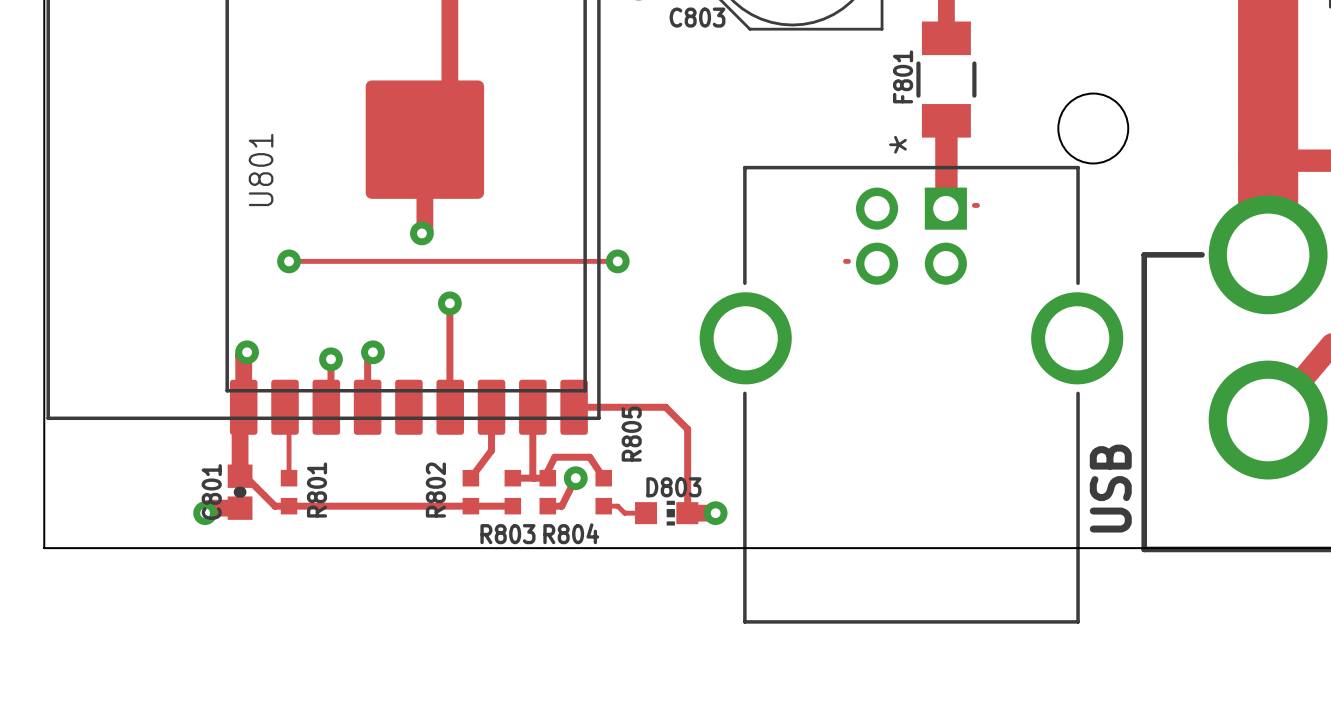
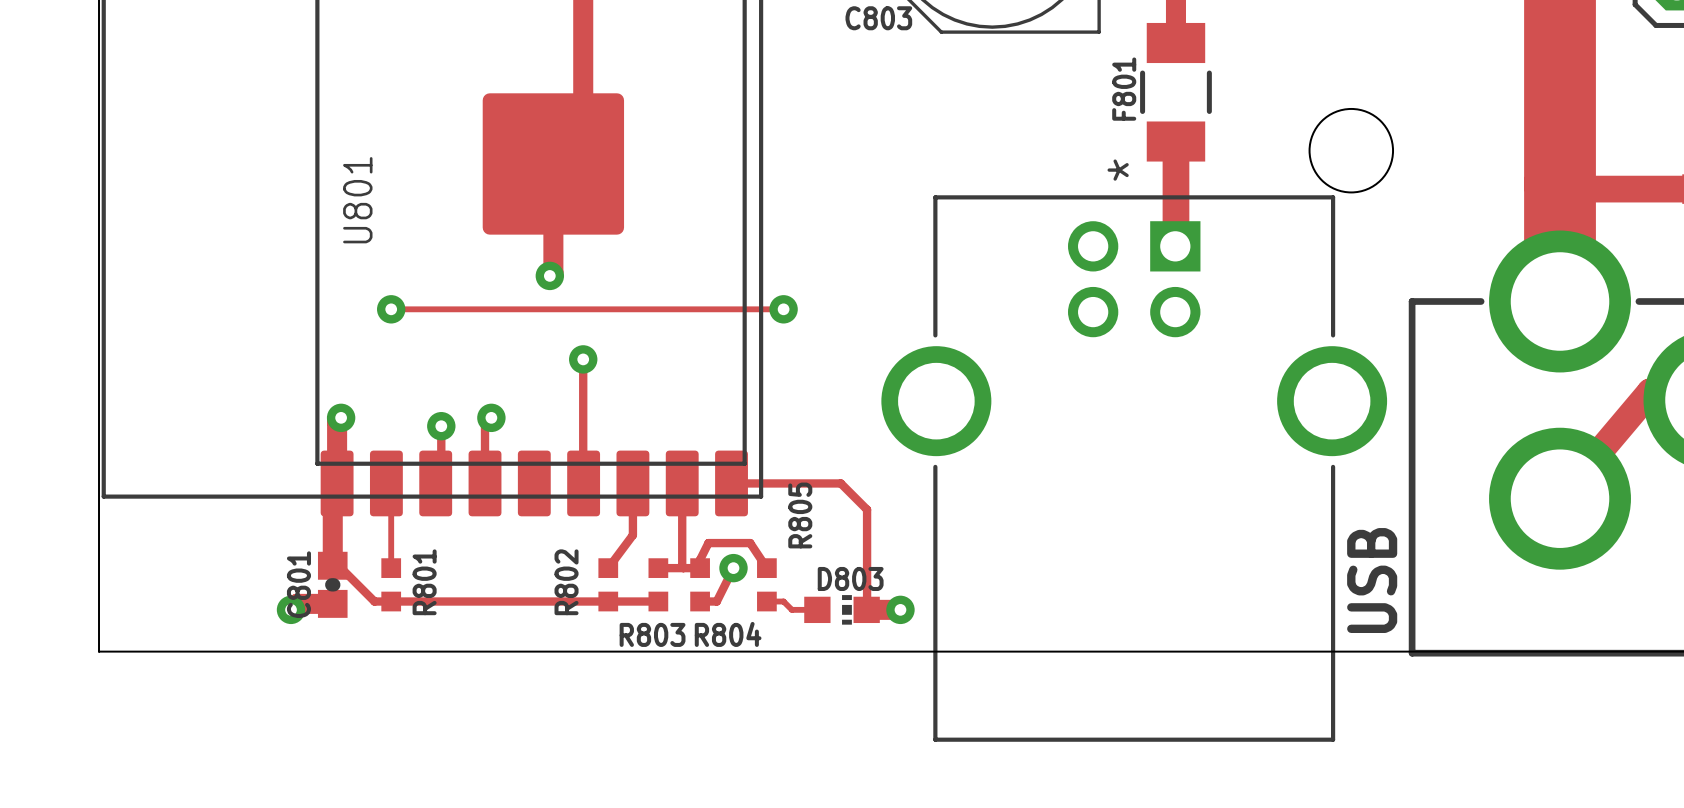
track: (974, 205) (977, 205) -> none
track: (845, 261) (848, 261) -> none

